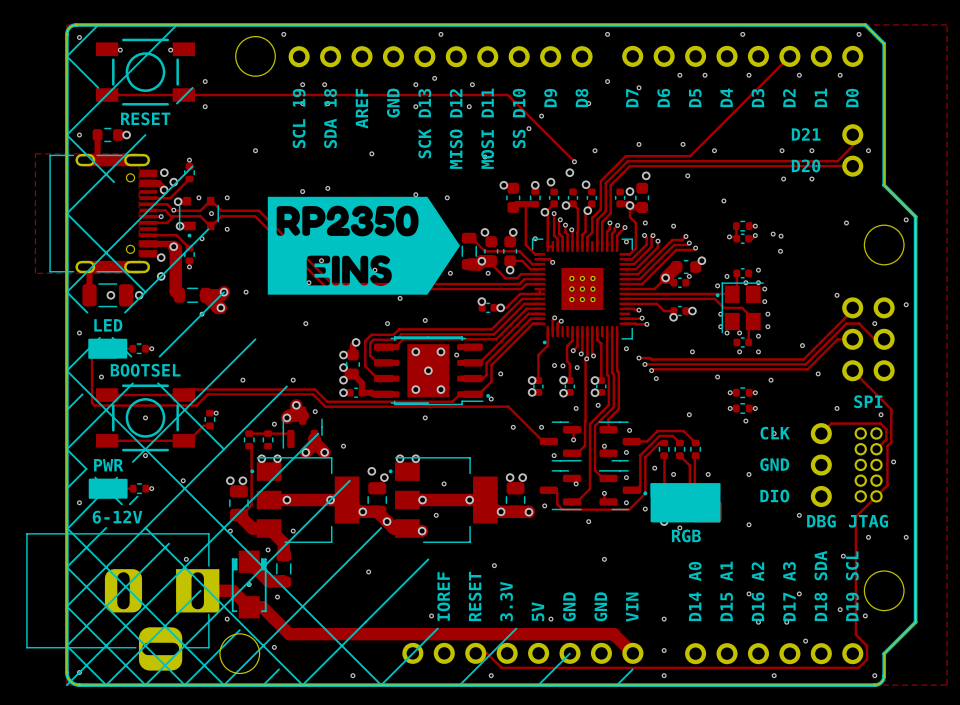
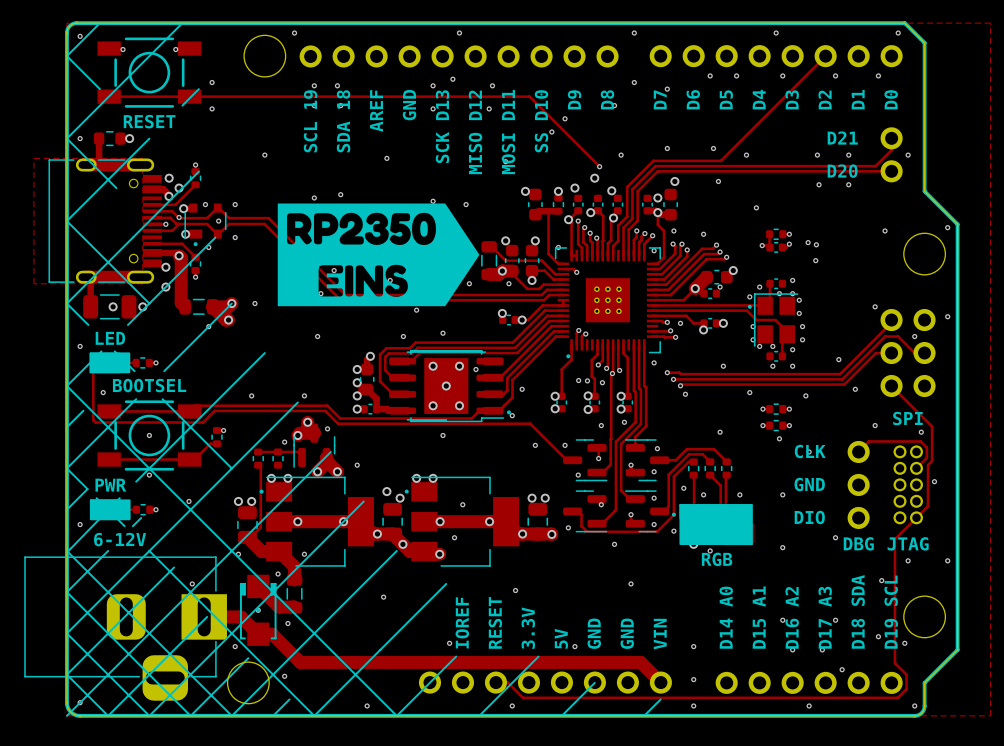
via: none -> (680, 323)

